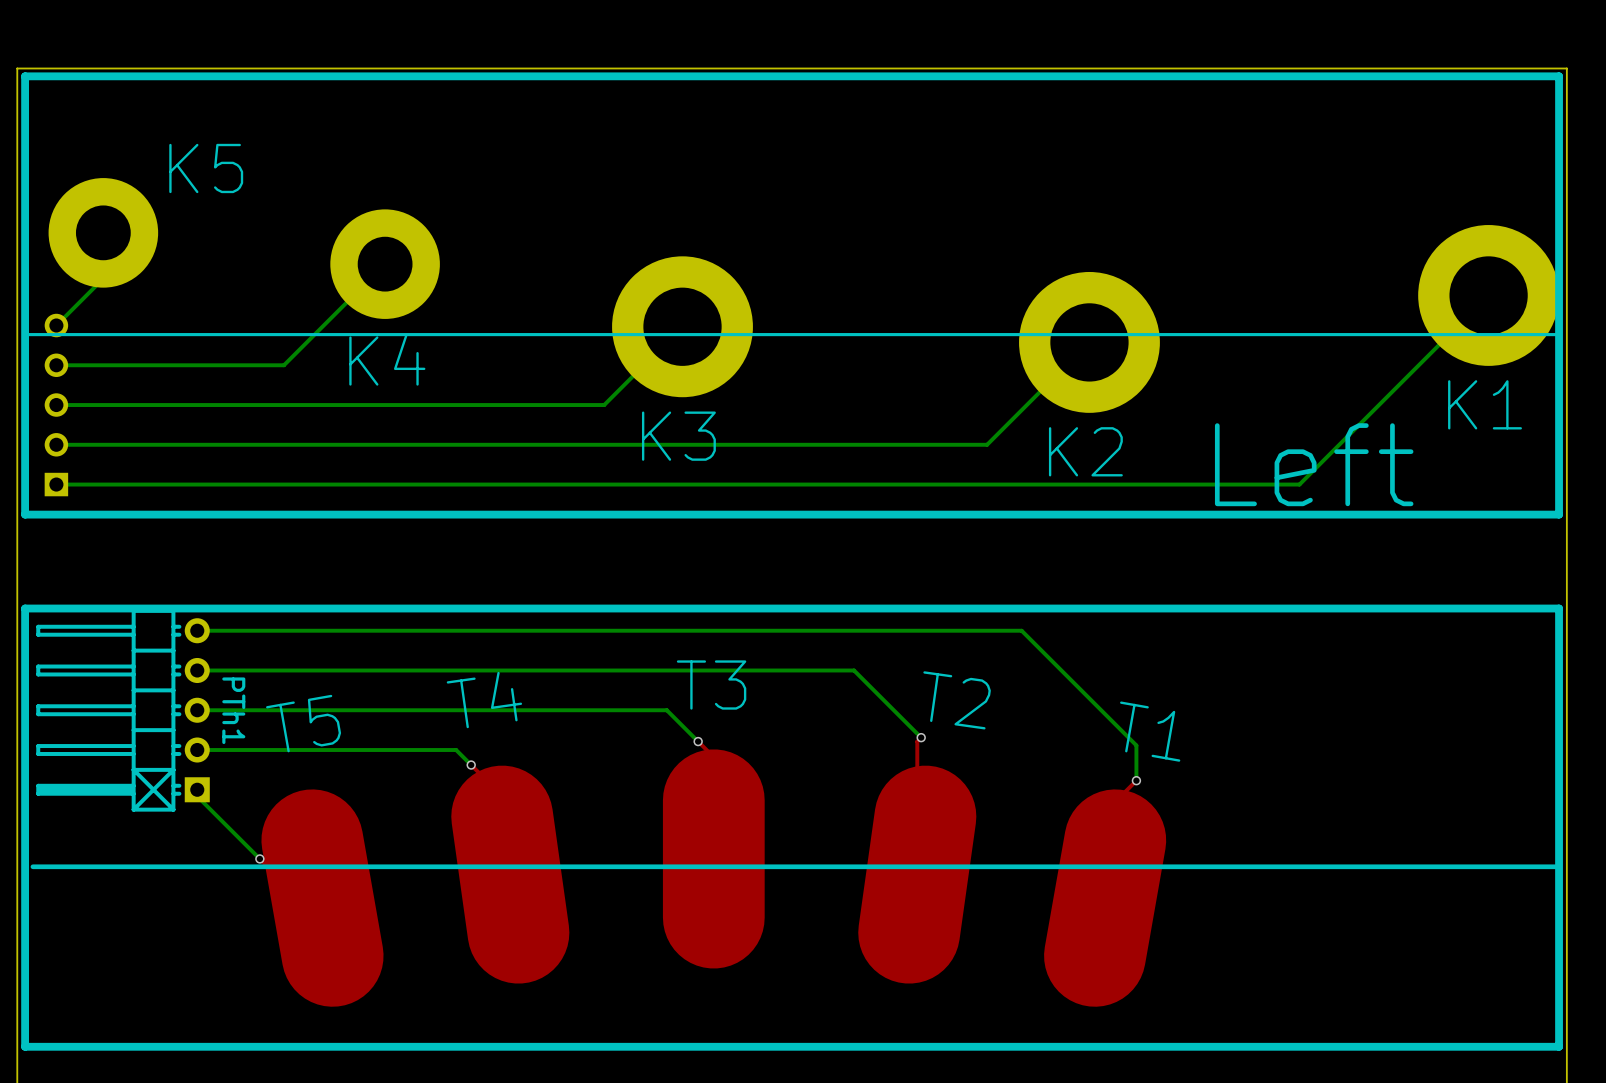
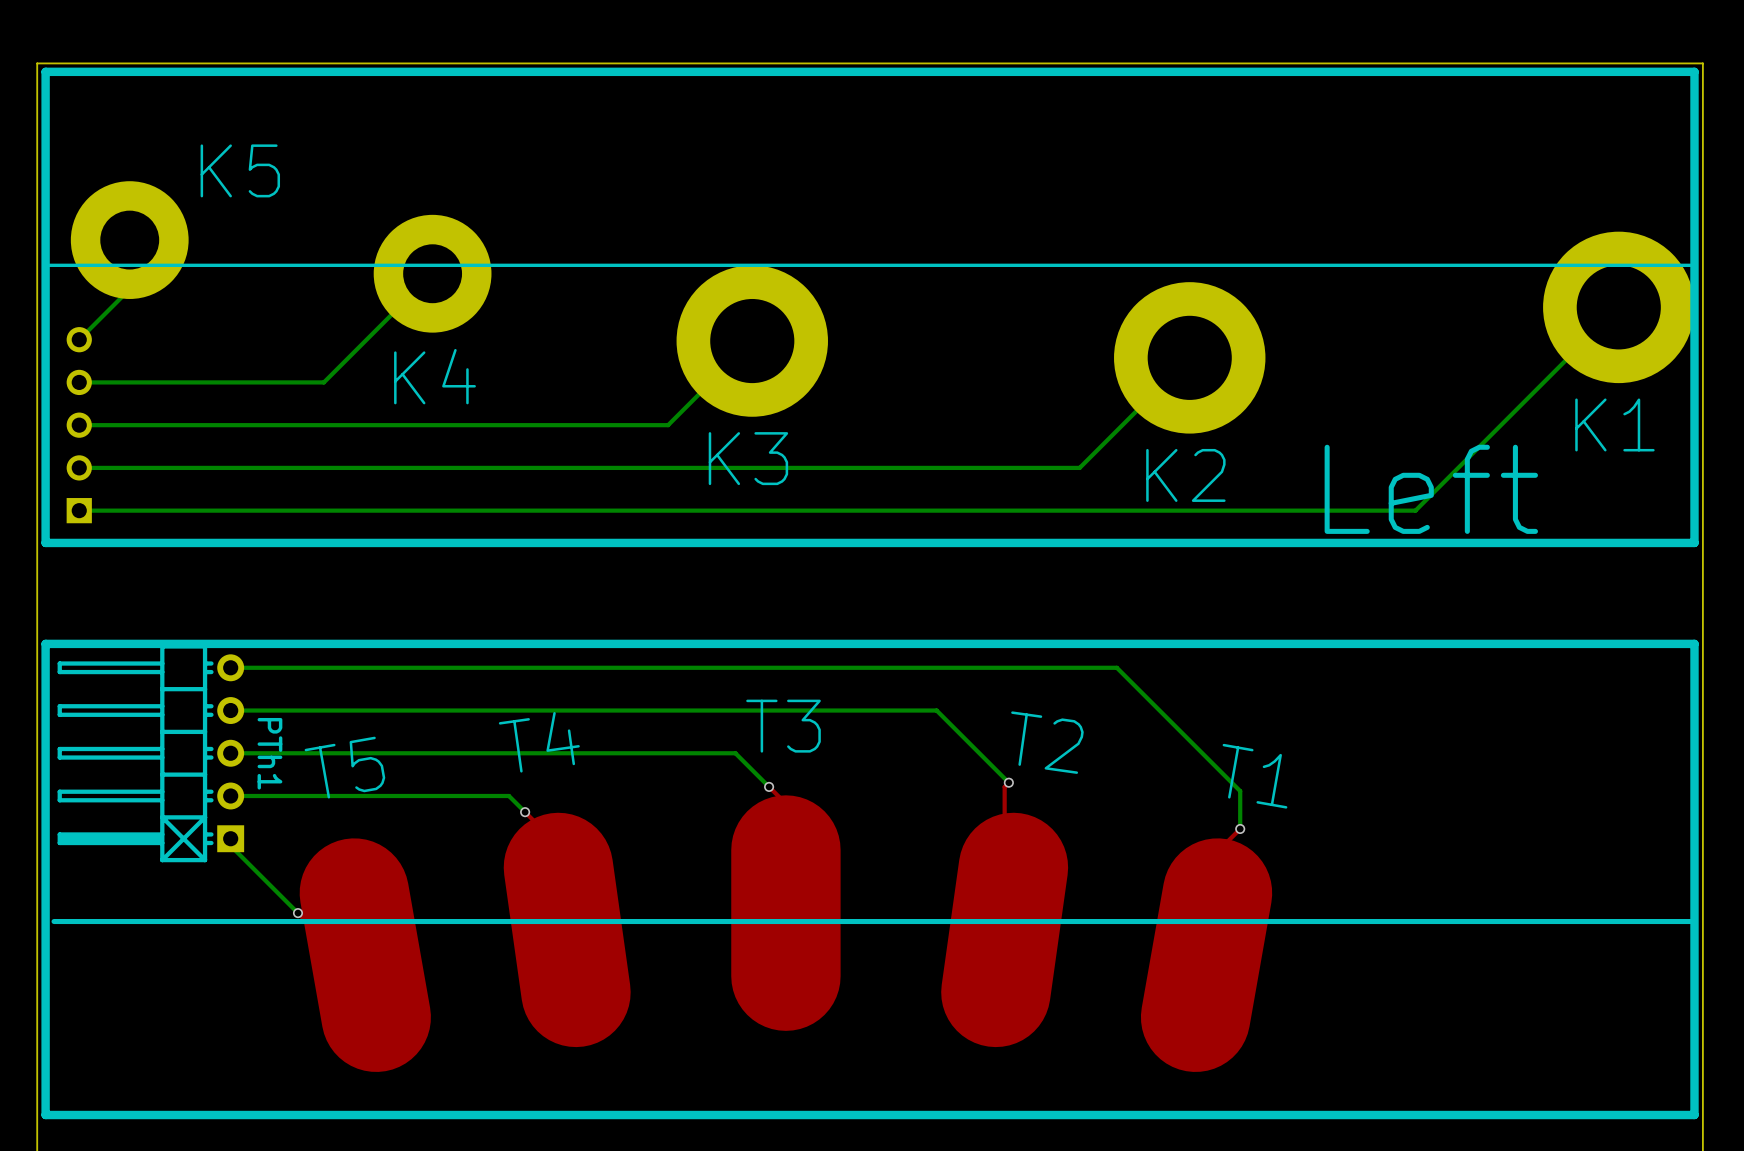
line: (1559, 334) (25, 334) -> (1694, 265) (45, 265)

